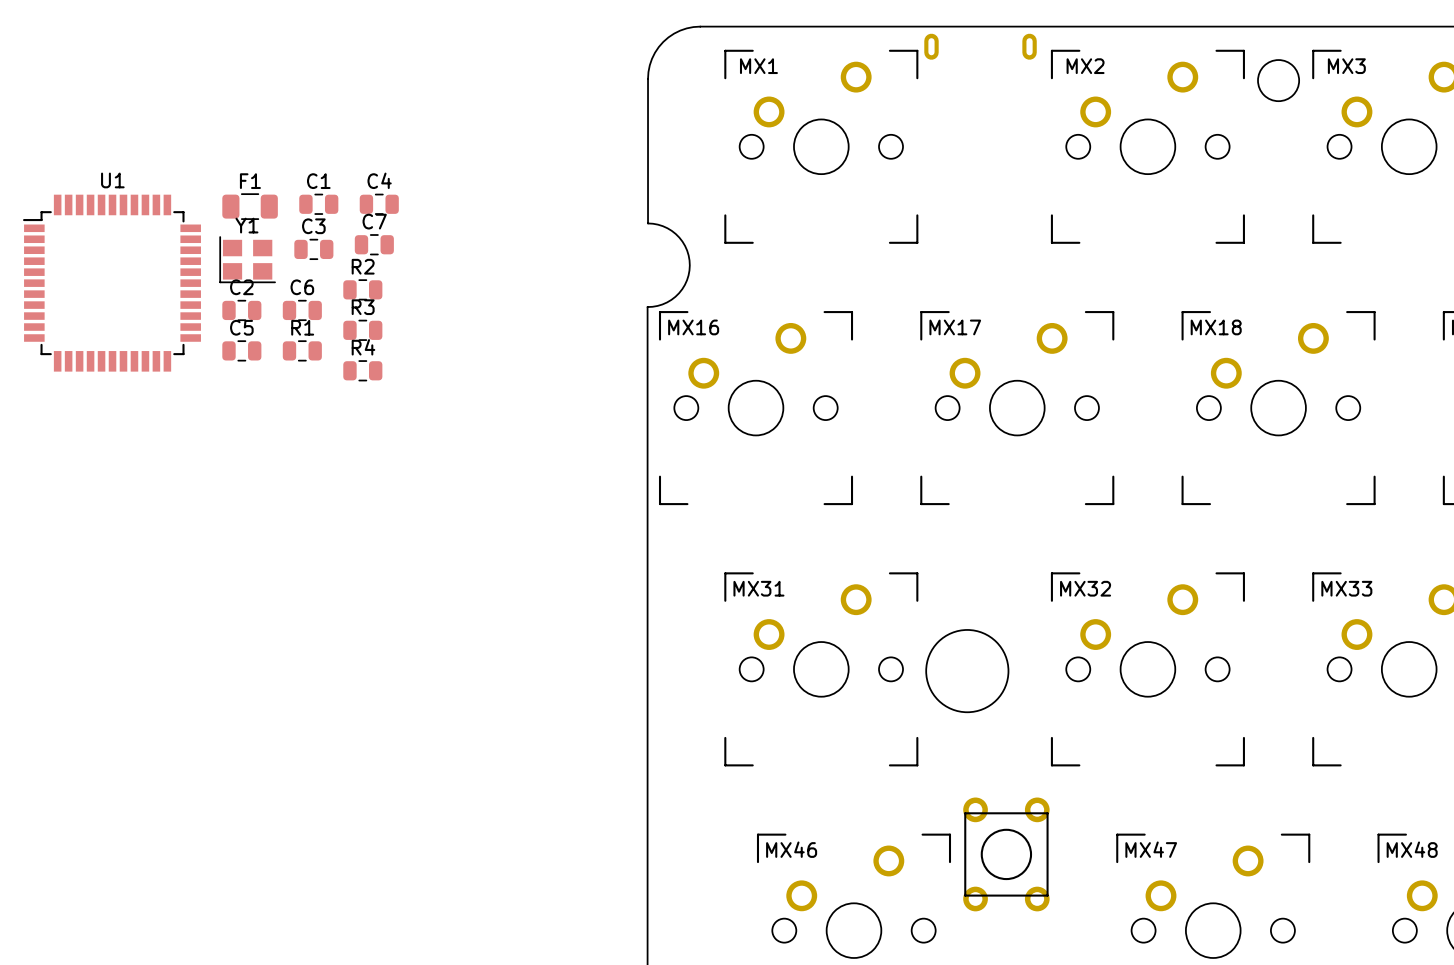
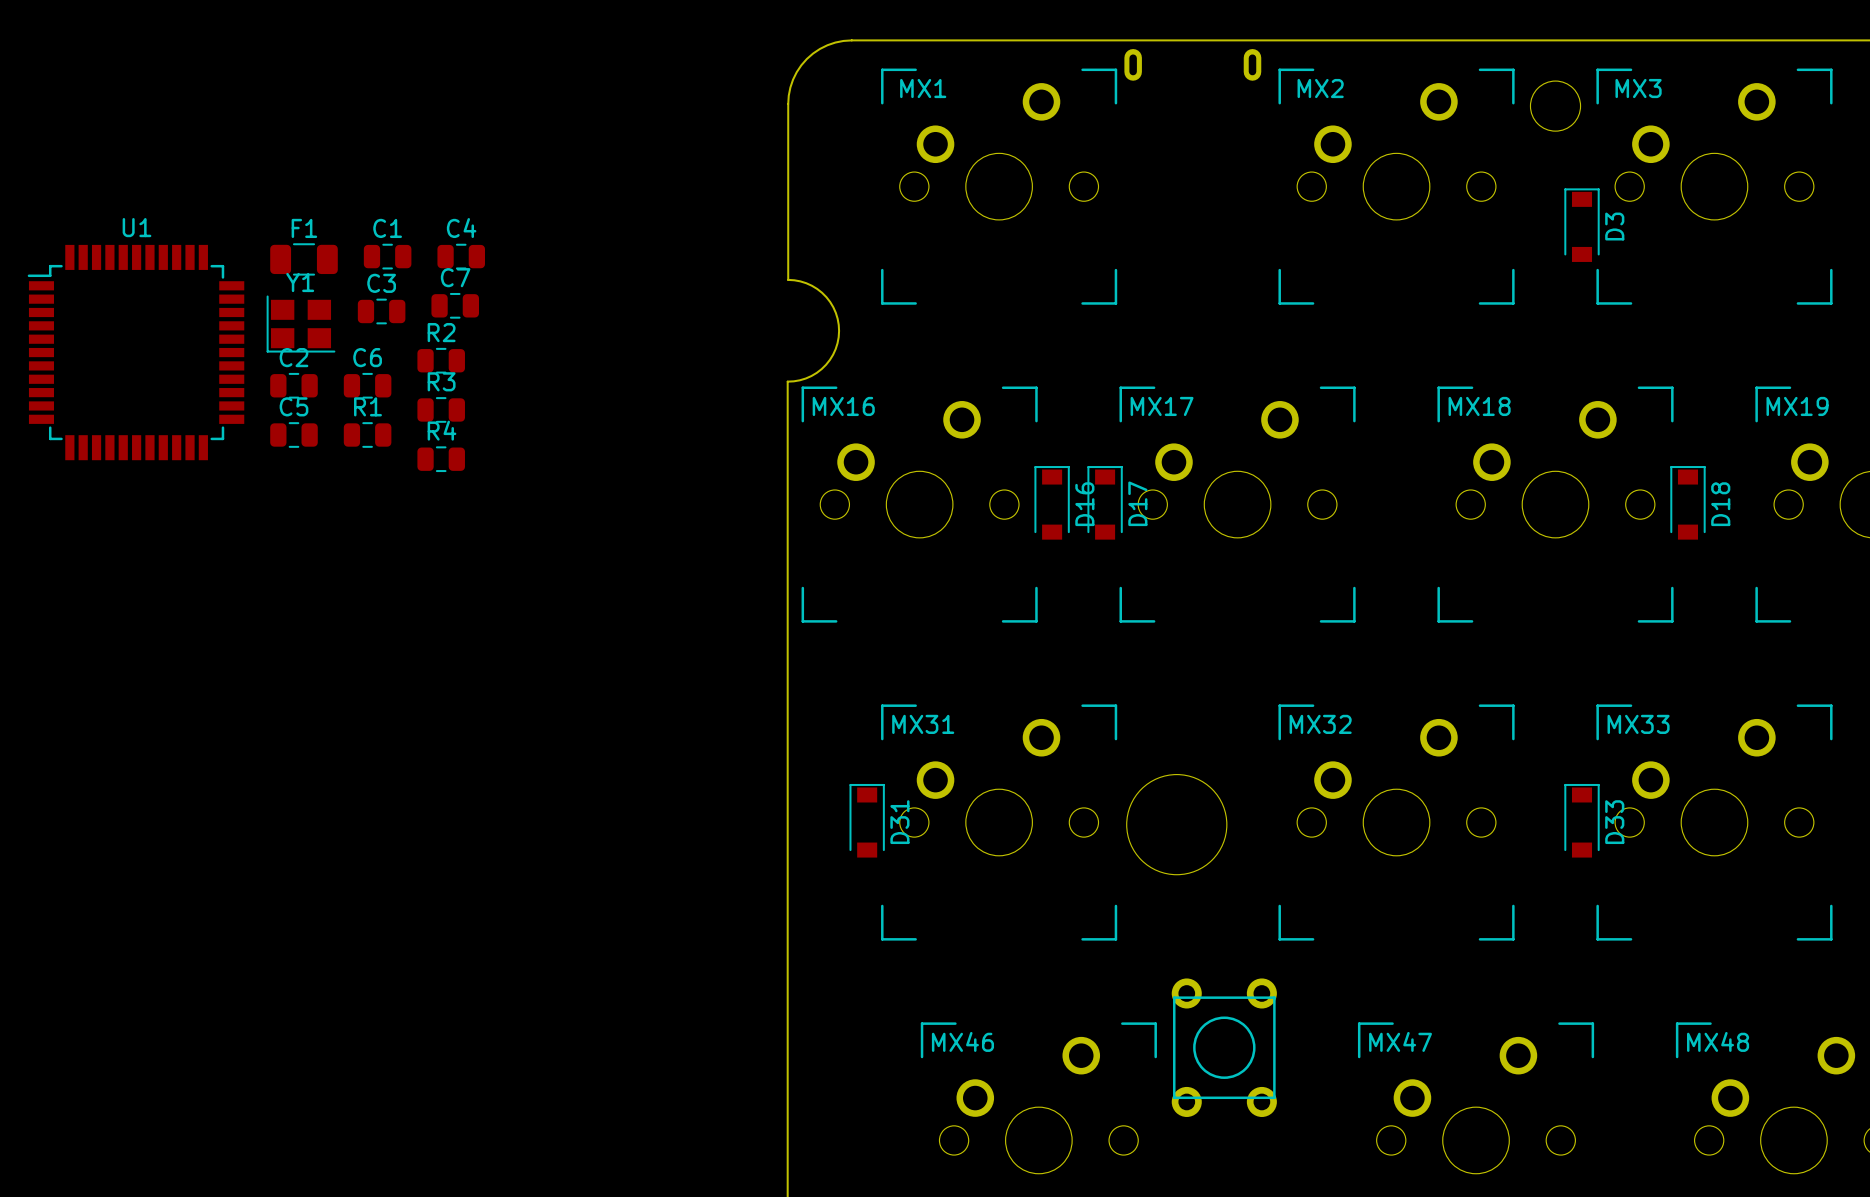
D3: none -> (1582, 225)
D16: none -> (1052, 502)
D17: none -> (1105, 502)
D18: none -> (1687, 502)
D31: none -> (867, 820)
D33: none -> (1582, 820)

